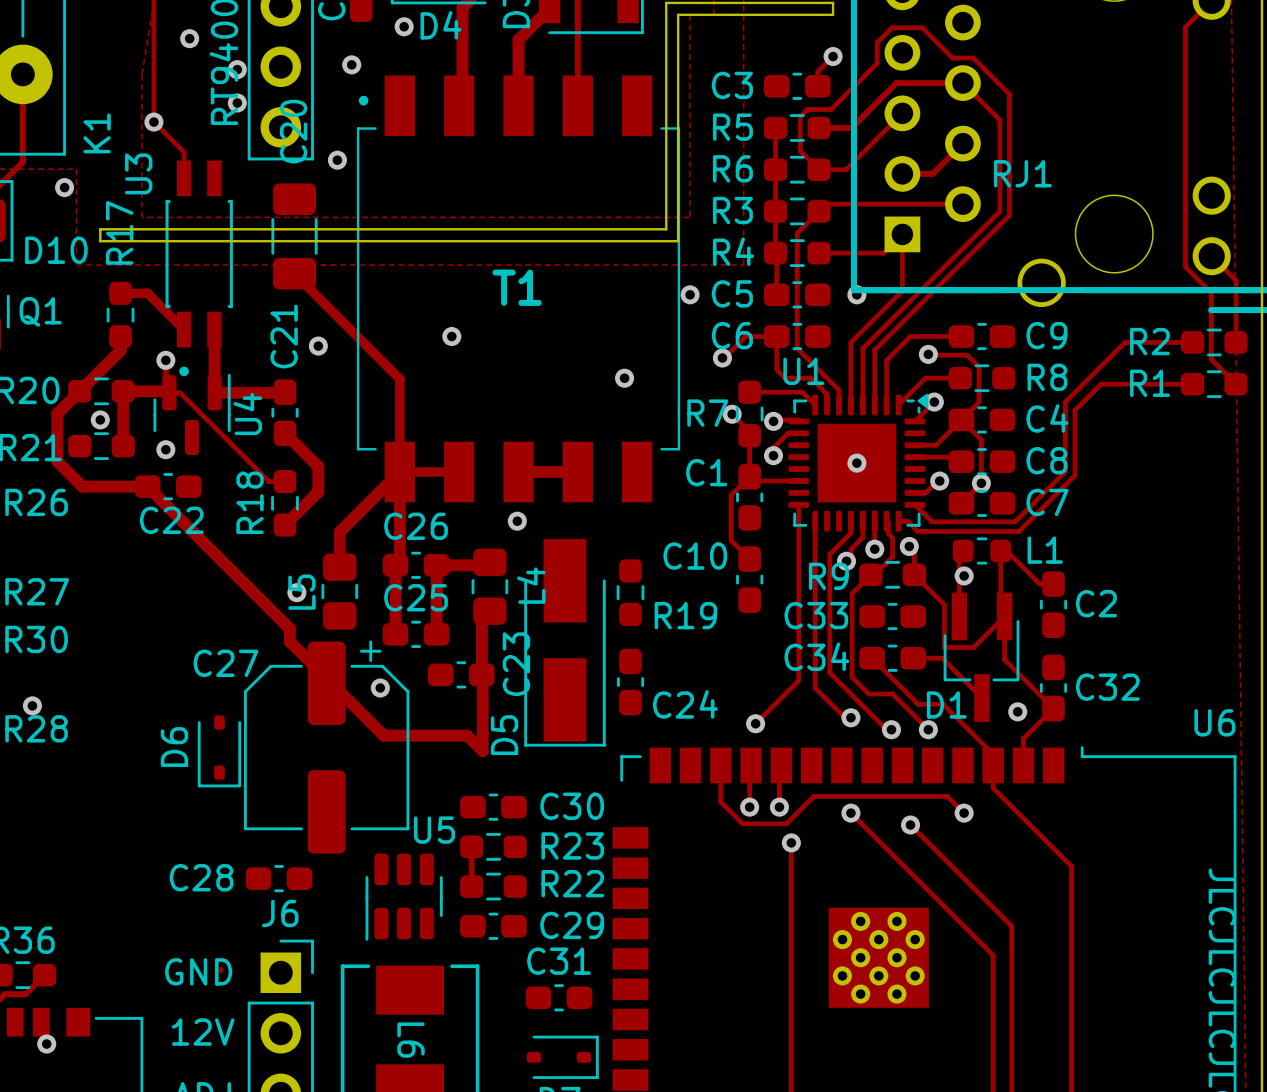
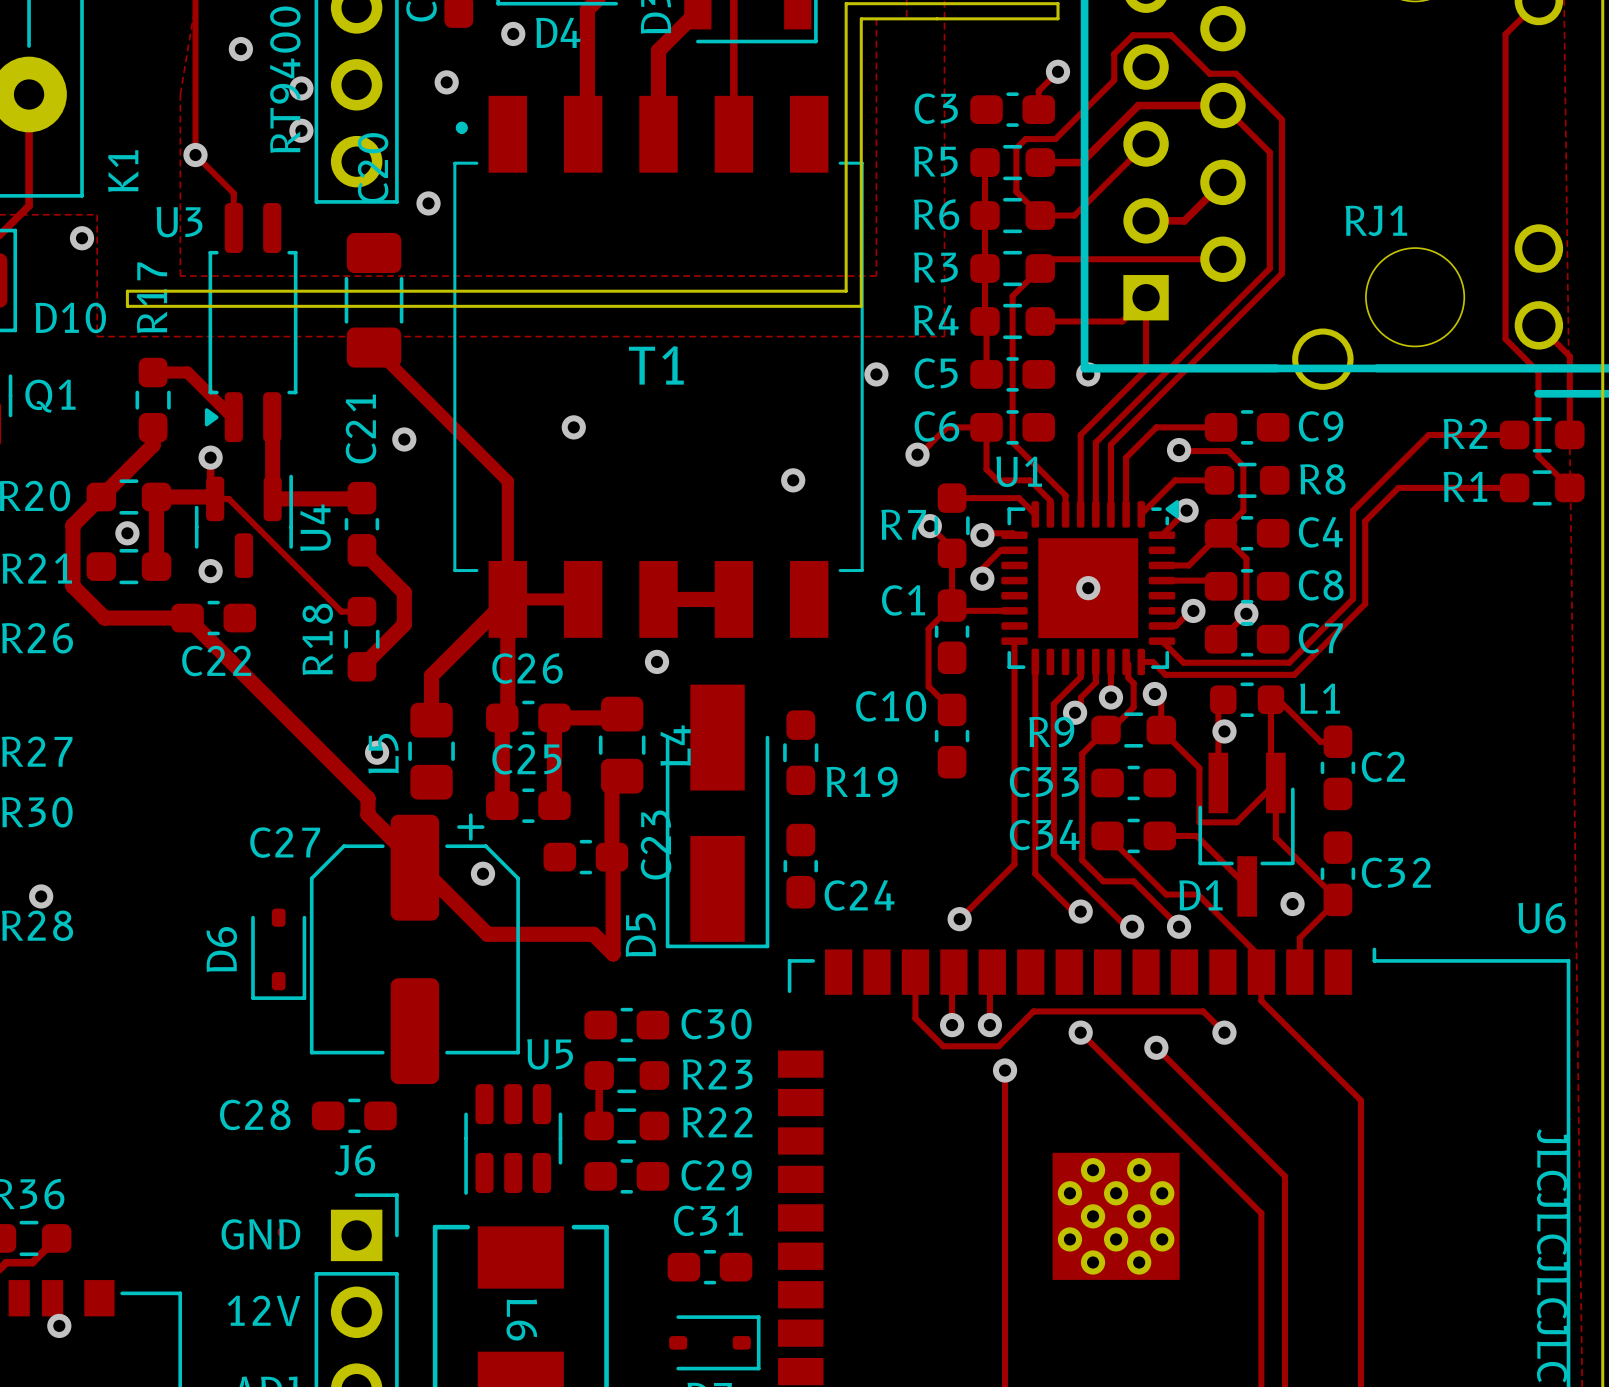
U3 footprint: [165, 160, 233, 377] -> [204, 203, 298, 443]
RJ1 name position: RJ1 (1022, 173) -> RJ1 (1376, 220)

